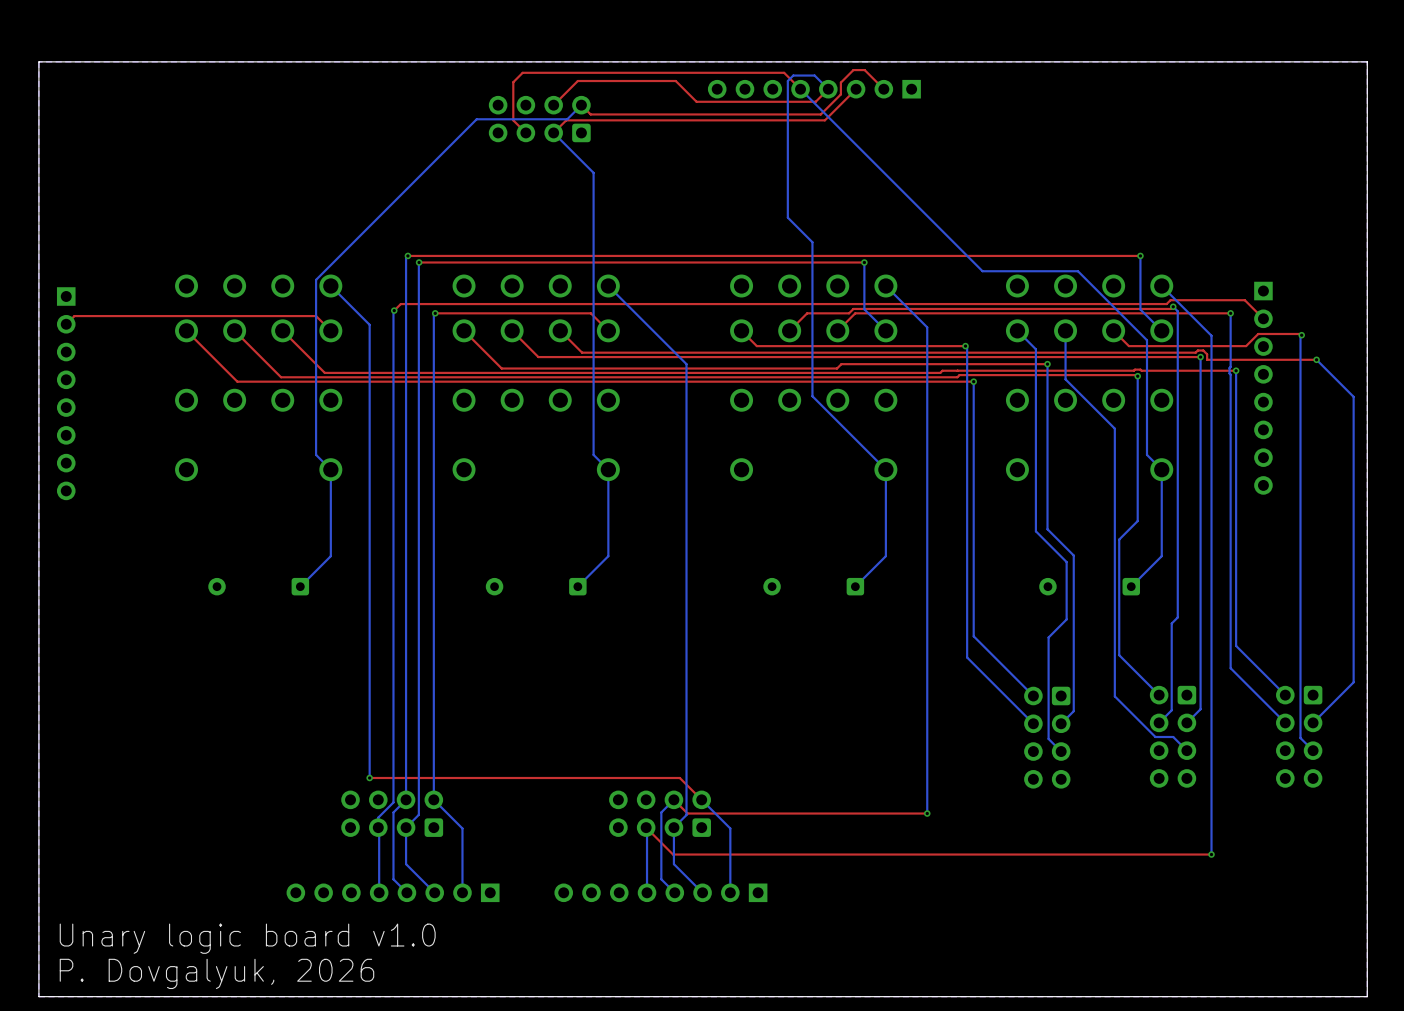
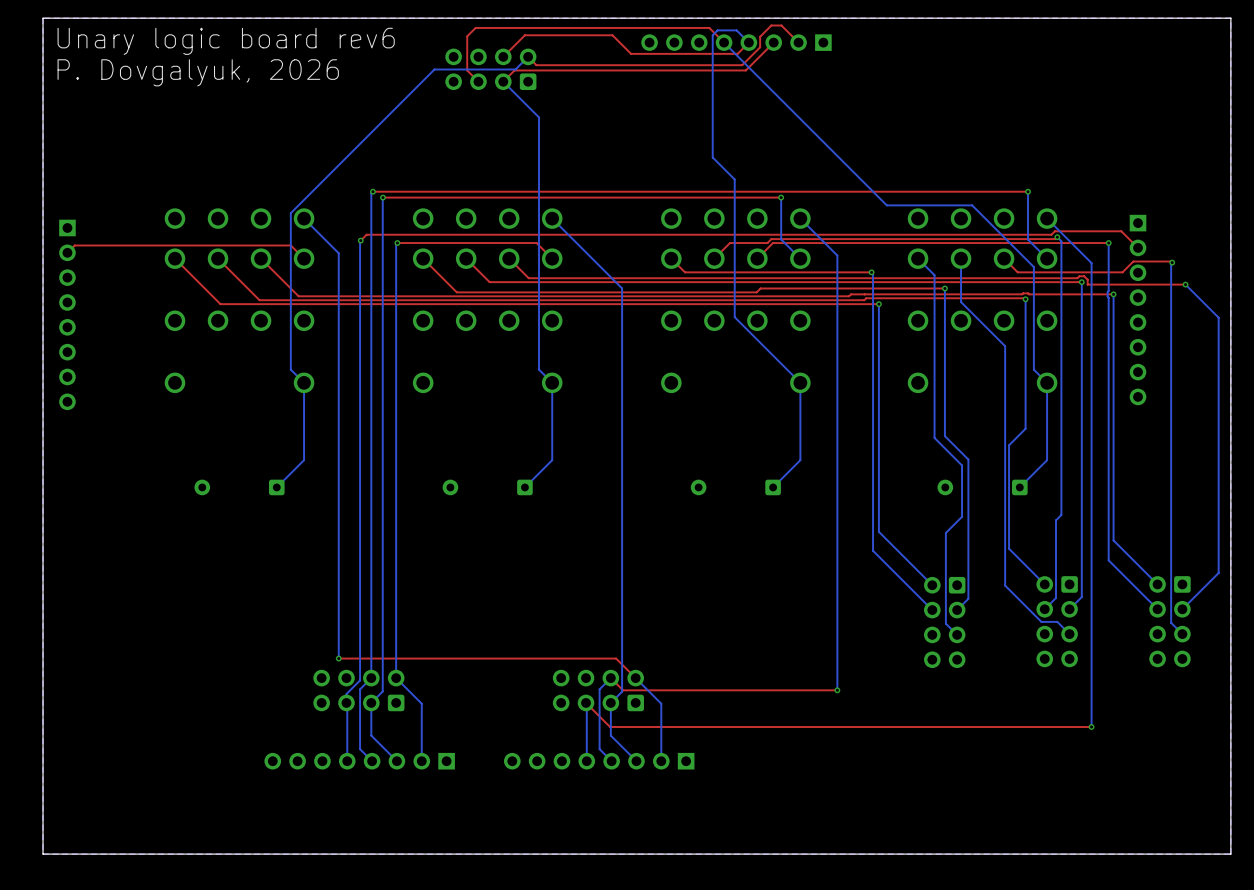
text: none -> Unary logic board rev6 (226, 41)
text: none -> P. Dovgalyuk, 2026 (198, 72)
text: Unary logic board v1.0 (247, 938) -> none
text: P. Dovgalyuk, 2026 (216, 973) -> none

